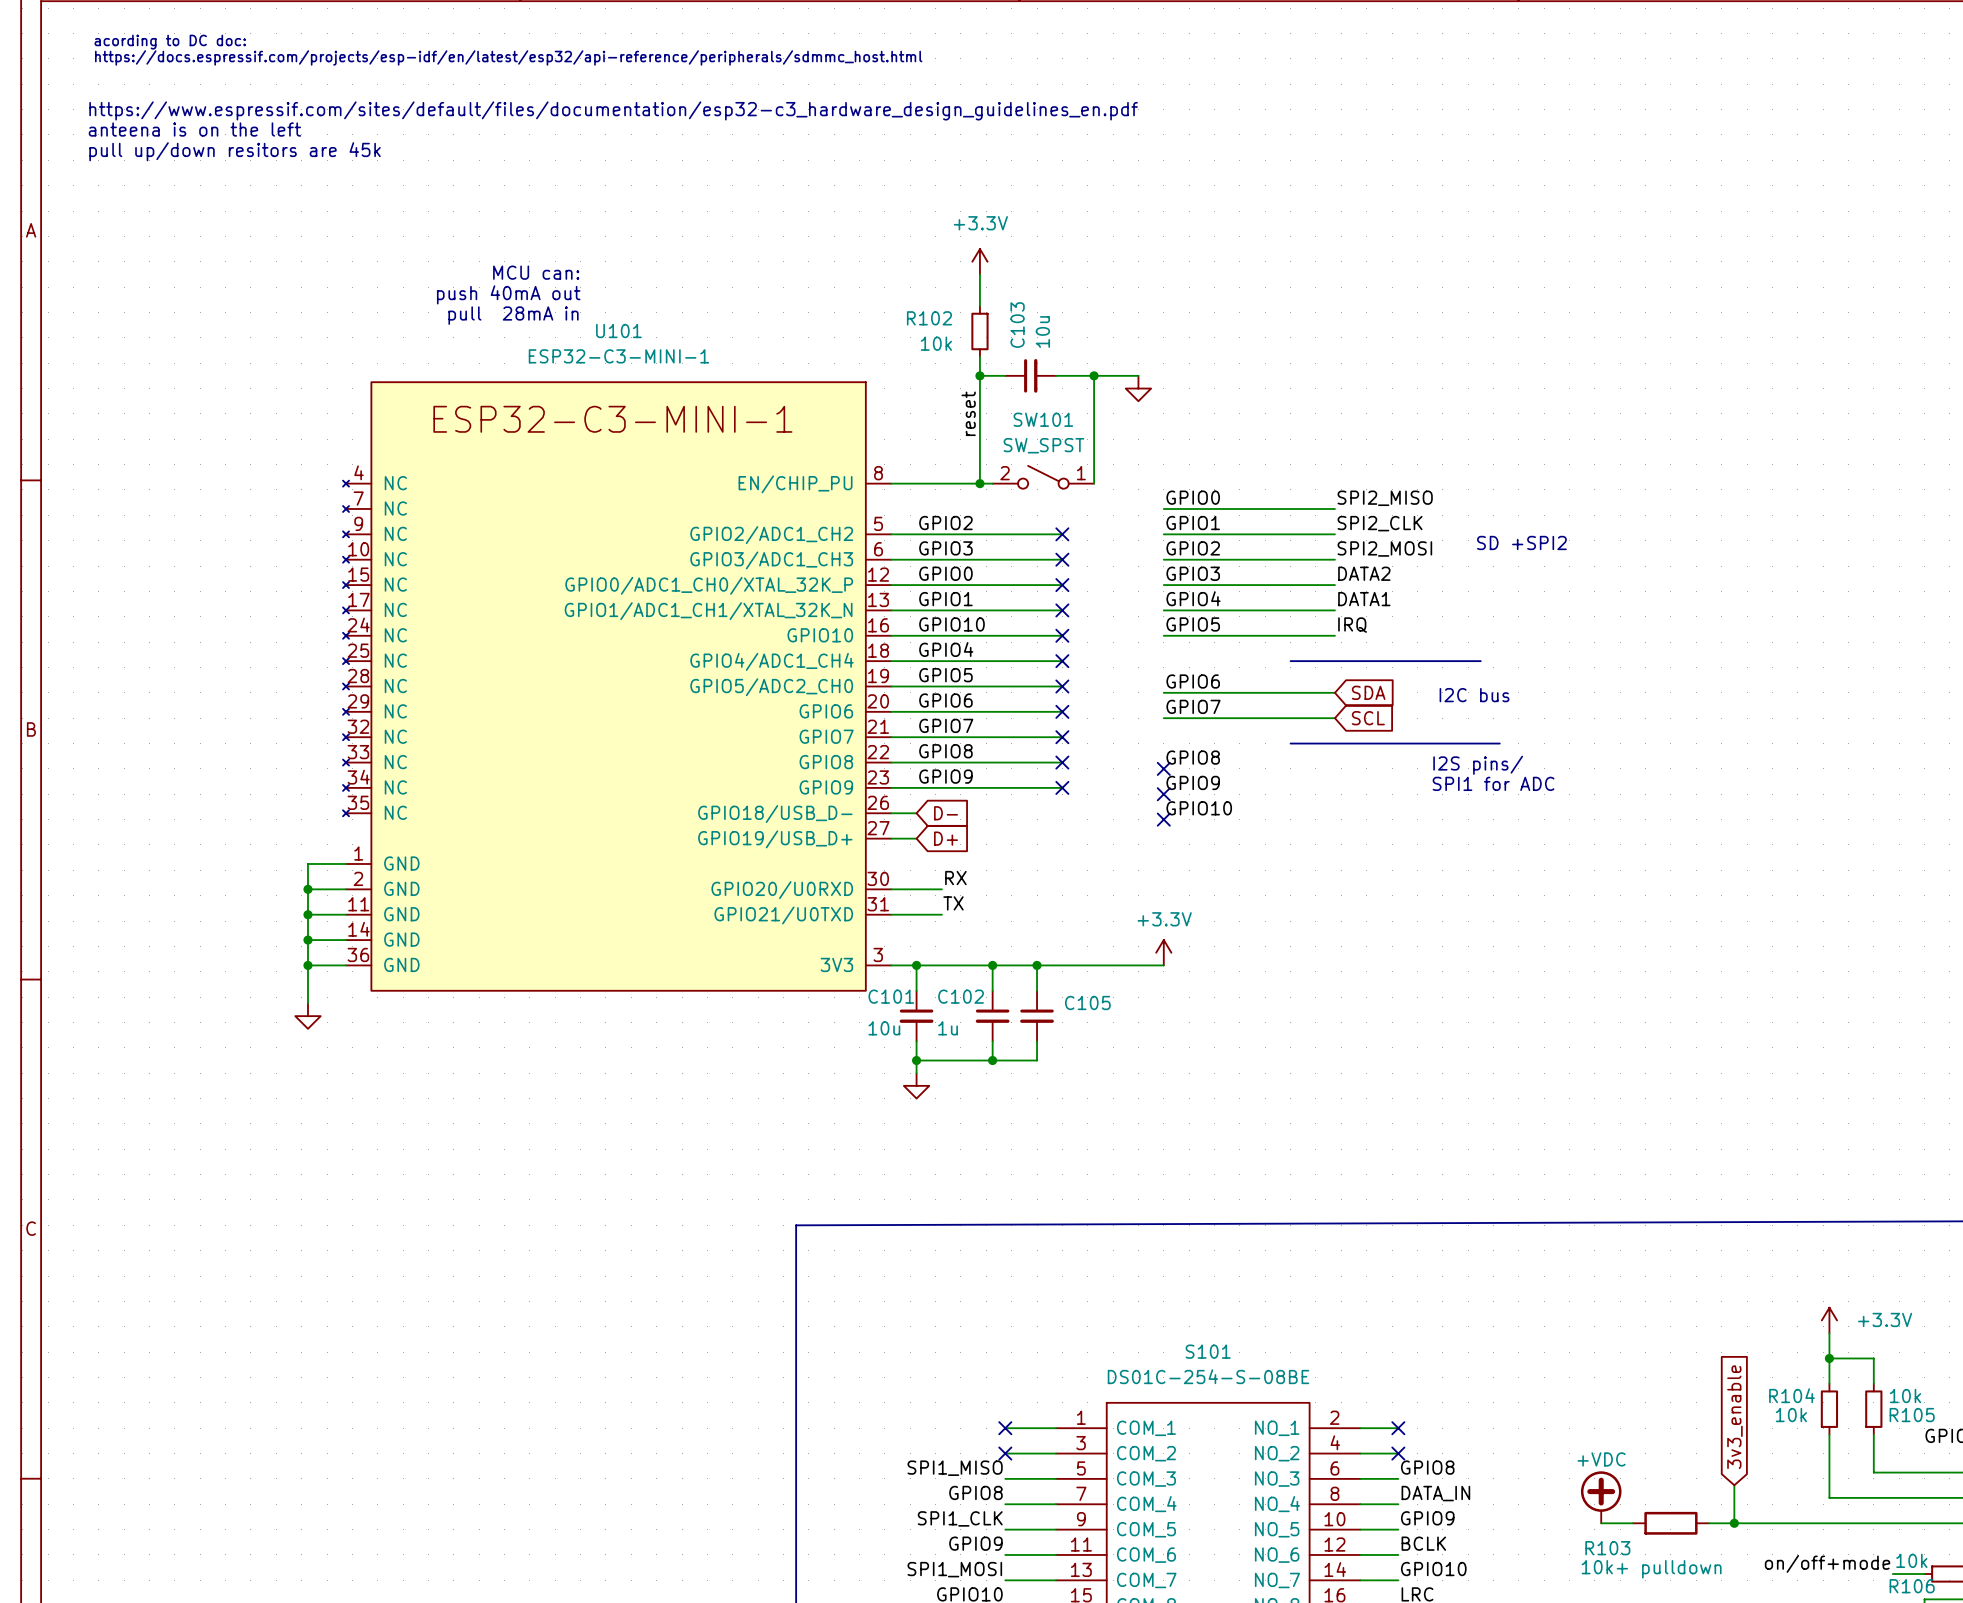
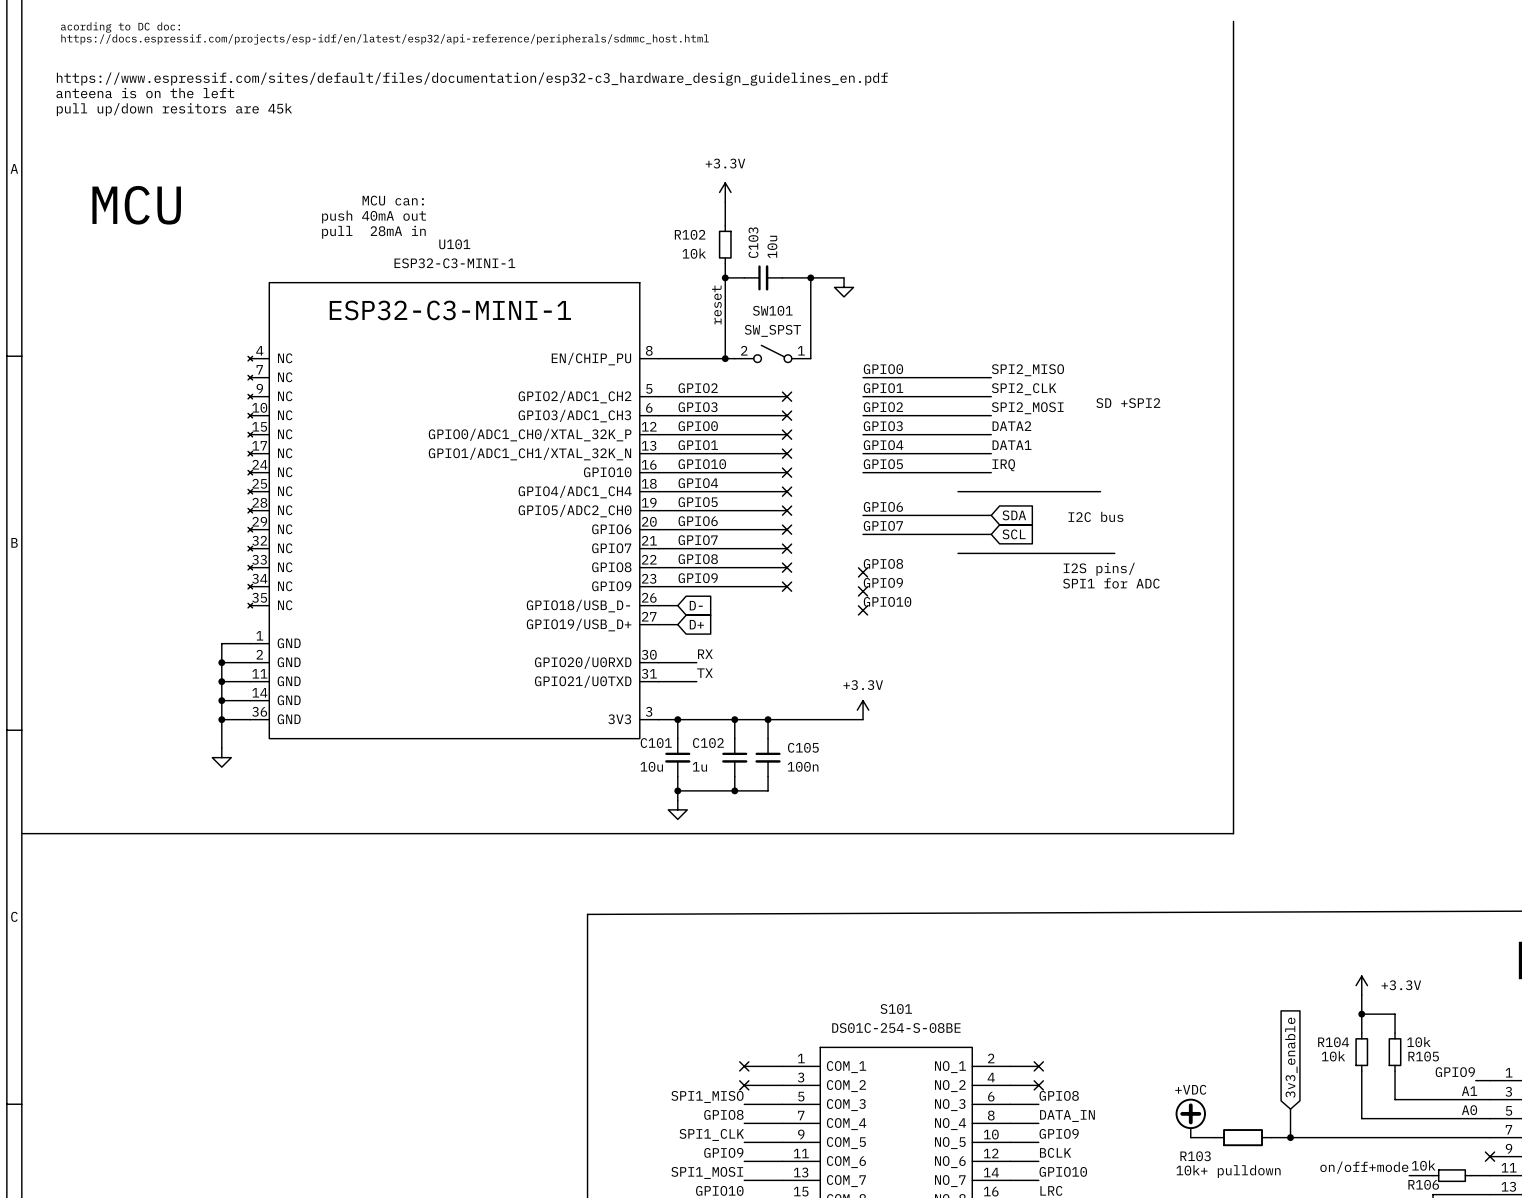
line: none -> (1233, 21) (1233, 833) (22, 833)
text: none -> MCU (136, 205)
C105 value: none -> 100n (803, 766)

